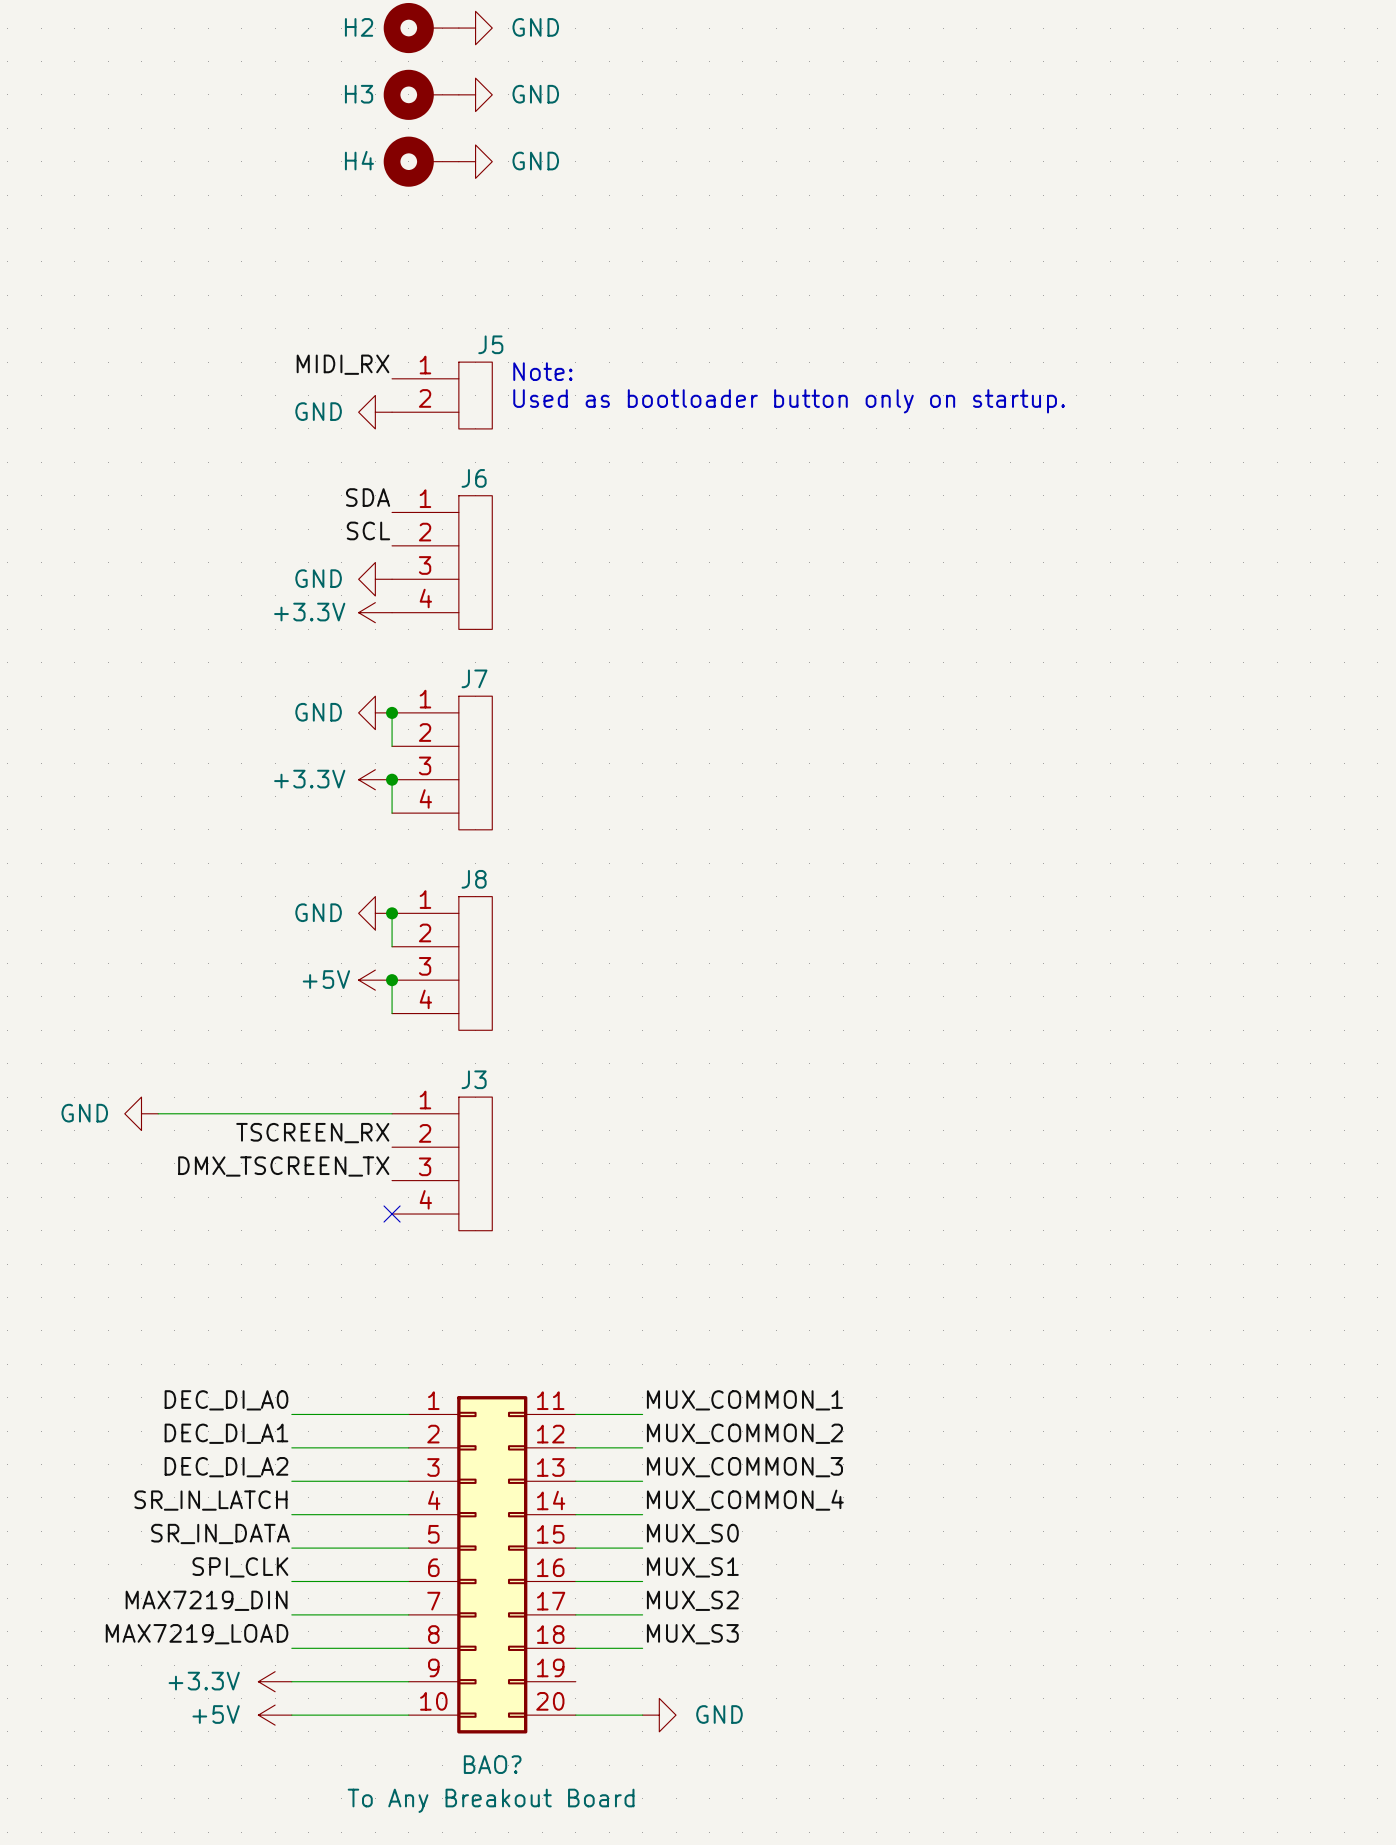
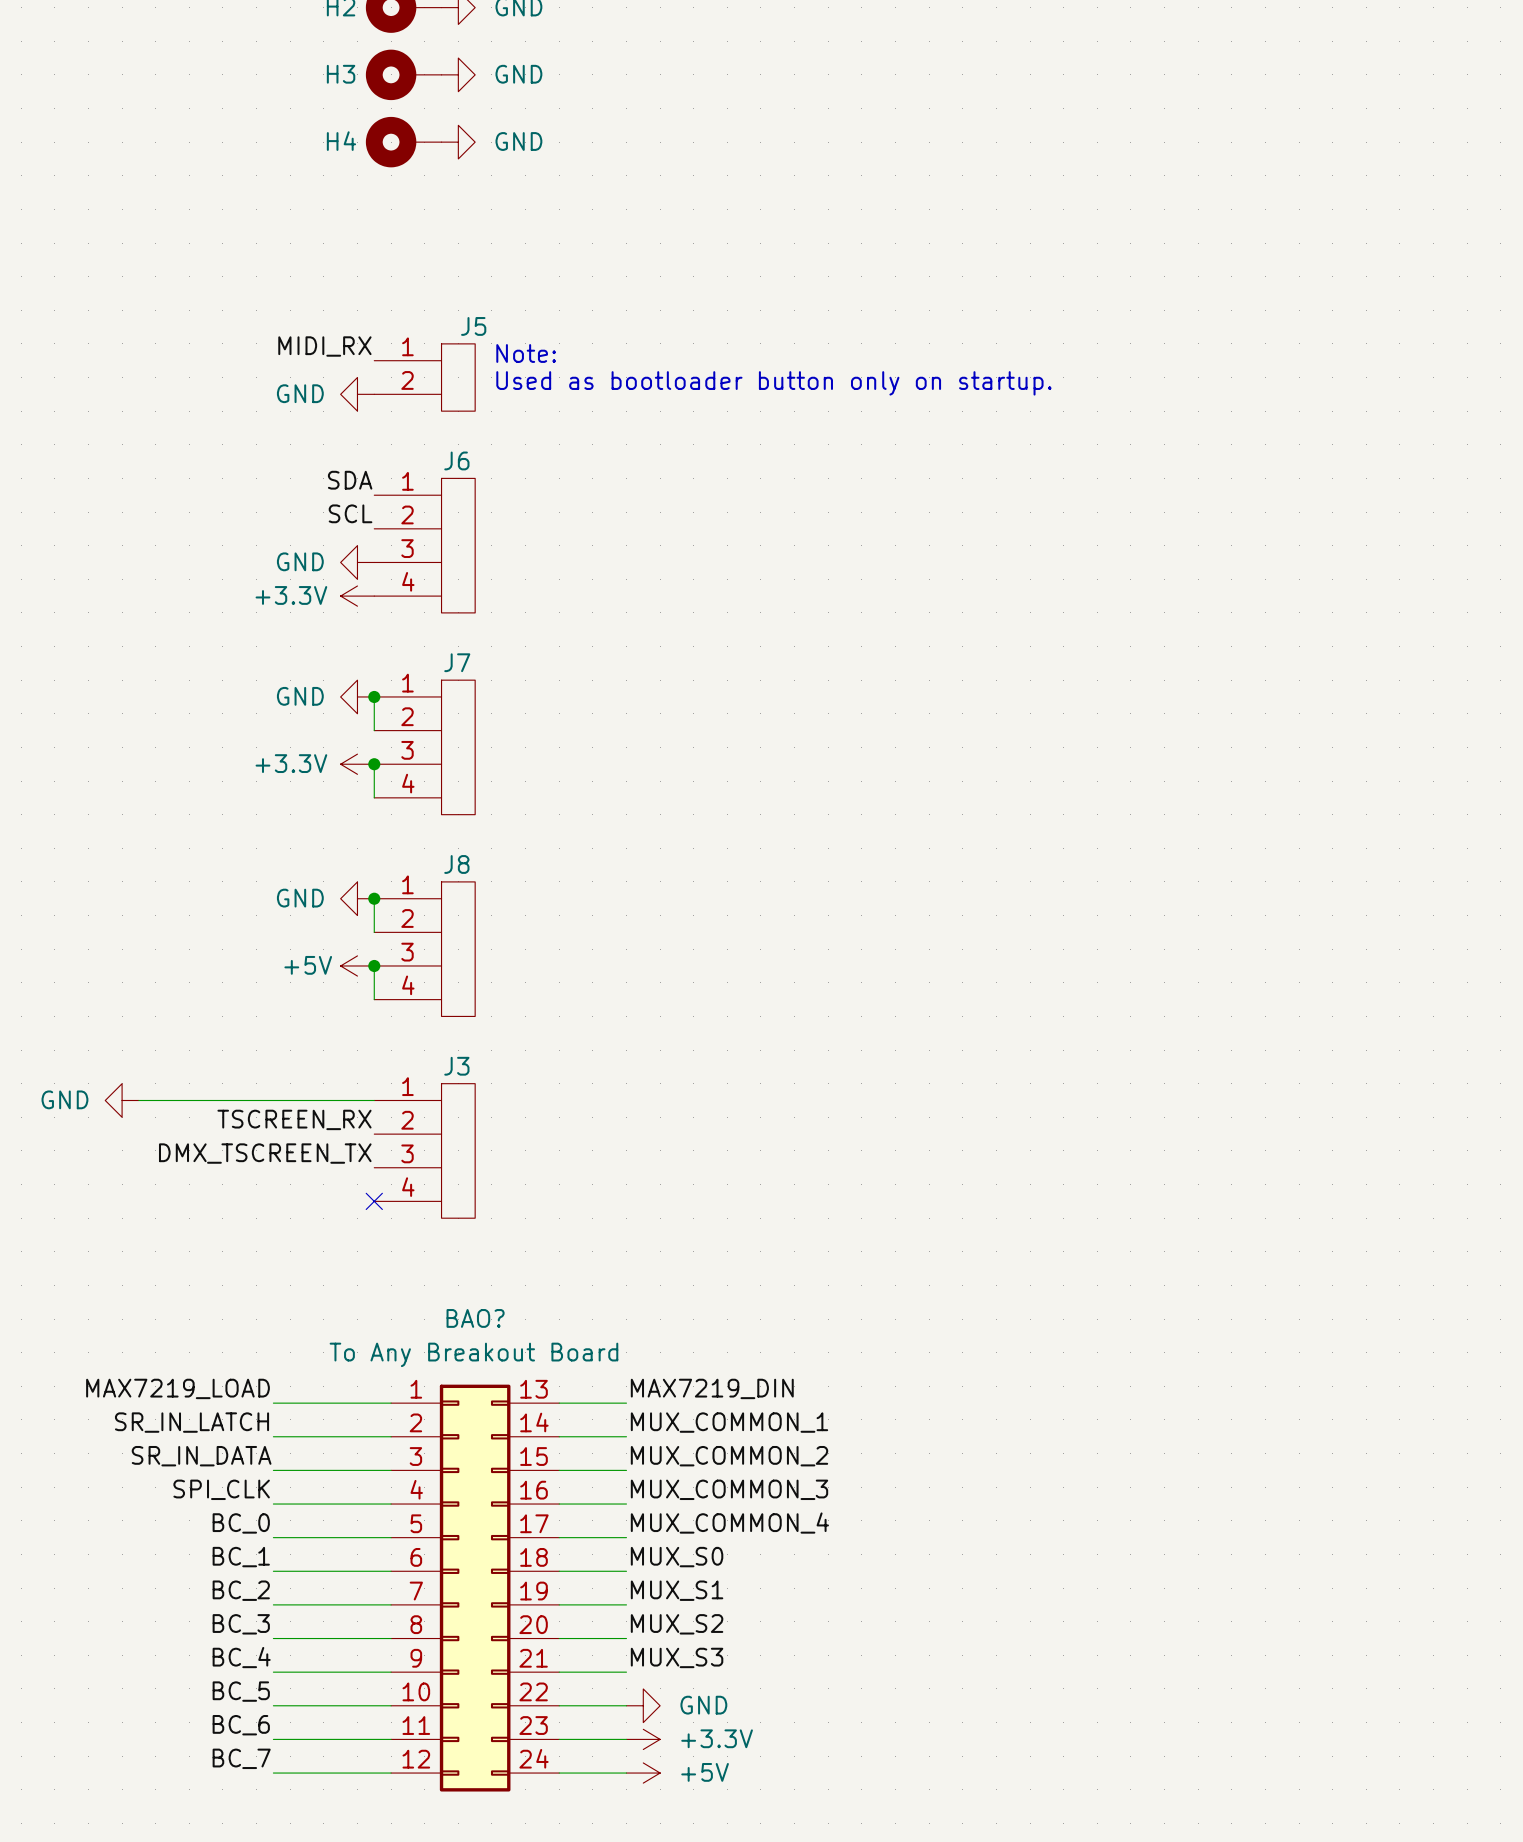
label: DEC_DI_A0 (226, 1400) -> MAX7219_LOAD (178, 1388)
label: MUX_COMMON_1 (744, 1400) -> MAX7219_DIN (712, 1388)
label: DEC_DI_A1 (226, 1433) -> SR_IN_LATCH (192, 1422)
label: MUX_COMMON_2 (744, 1433) -> MUX_COMMON_1 (729, 1422)
label: DEC_DI_A2 (226, 1467) -> SR_IN_DATA (201, 1456)
label: MUX_COMMON_3 (744, 1467) -> MUX_COMMON_2 (729, 1456)
label: SR_IN_LATCH (210, 1500) -> SPI_CLK (221, 1489)
label: MUX_COMMON_4 (745, 1500) -> MUX_COMMON_3 (729, 1489)
label: SR_IN_DATA (220, 1533) -> BC_0 (241, 1523)
label: MUX_S0 (692, 1533) -> MUX_COMMON_4 (729, 1523)
BAO?: (492, 1564) -> none
label: SPI_CLK (240, 1567) -> BC_1 (241, 1557)
label: MUX_S1 (692, 1567) -> MUX_S0 (677, 1557)
BAO?: none -> (475, 1588)
label: MAX7219_DIN (206, 1600) -> BC_2 (241, 1590)
label: MUX_S2 (692, 1600) -> MUX_S1 (677, 1590)
label: MAX7219_LOAD (197, 1634) -> BC_3 (241, 1624)
label: MUX_S3 (692, 1634) -> MUX_S2 (677, 1624)
label: none -> BC_4 (241, 1657)
label: none -> MUX_S3 (677, 1657)
power symbol: +3.3V (275, 1681) -> none
wire: none -> (559, 1672) (626, 1672)
label: none -> BC_5 (241, 1691)
power symbol: +5V (275, 1715) -> none
label: none -> BC_6 (241, 1725)
wire: none -> (273, 1739) (391, 1739)
wire: none -> (559, 1739) (626, 1739)
power symbol: none -> +3.3V (643, 1739)
label: none -> BC_7 (241, 1758)
wire: none -> (273, 1773) (391, 1773)
wire: none -> (559, 1773) (626, 1773)
power symbol: none -> +5V (643, 1773)

